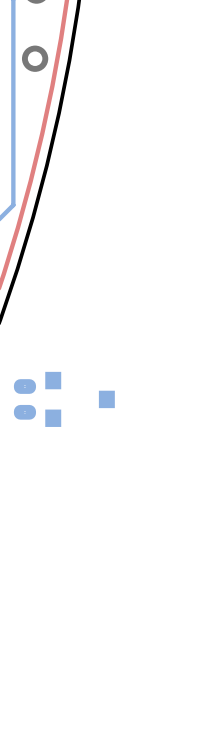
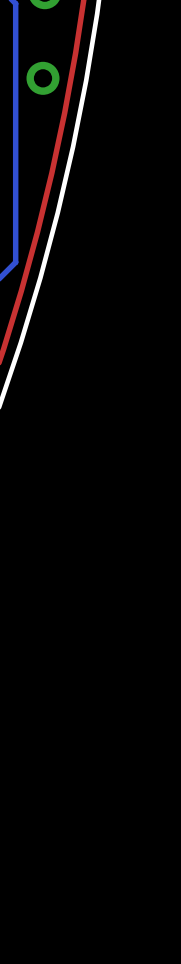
part: (24, 399) -> none
part: (80, 399) -> none

